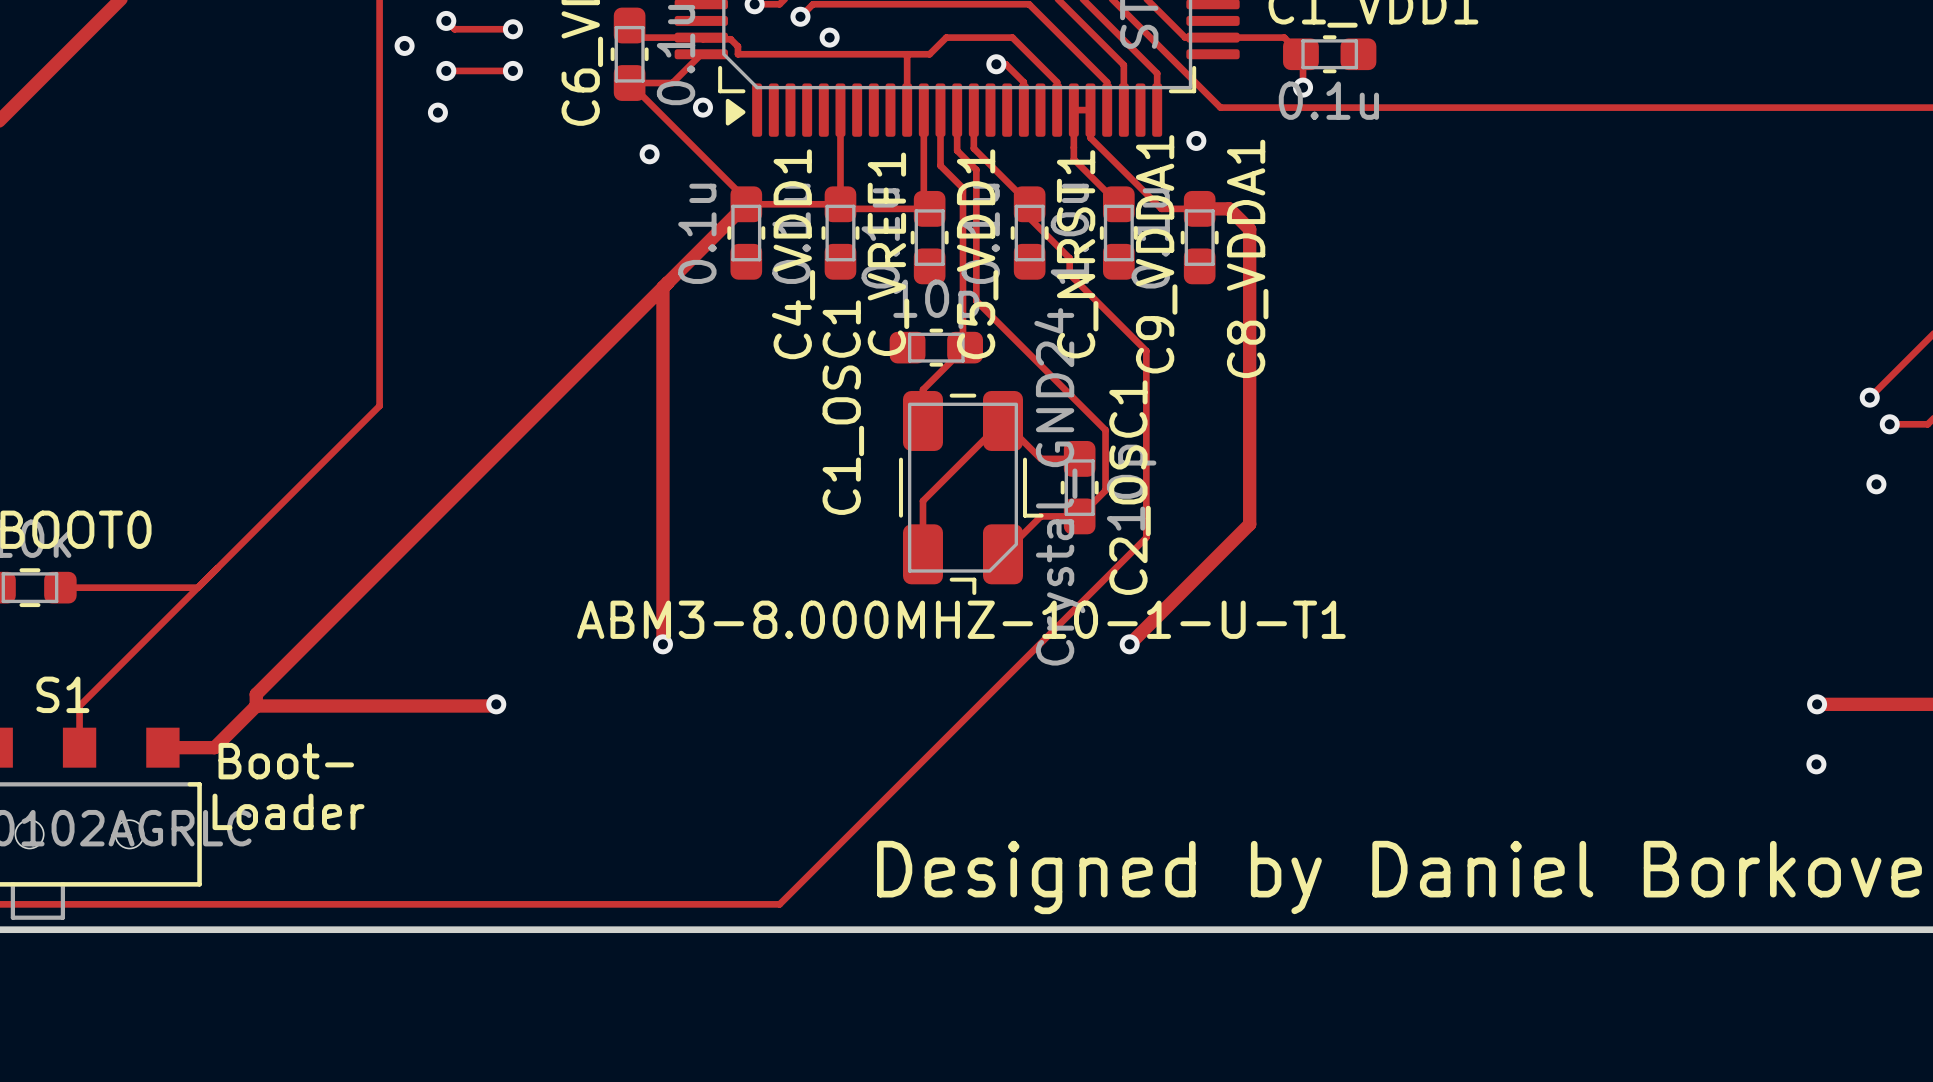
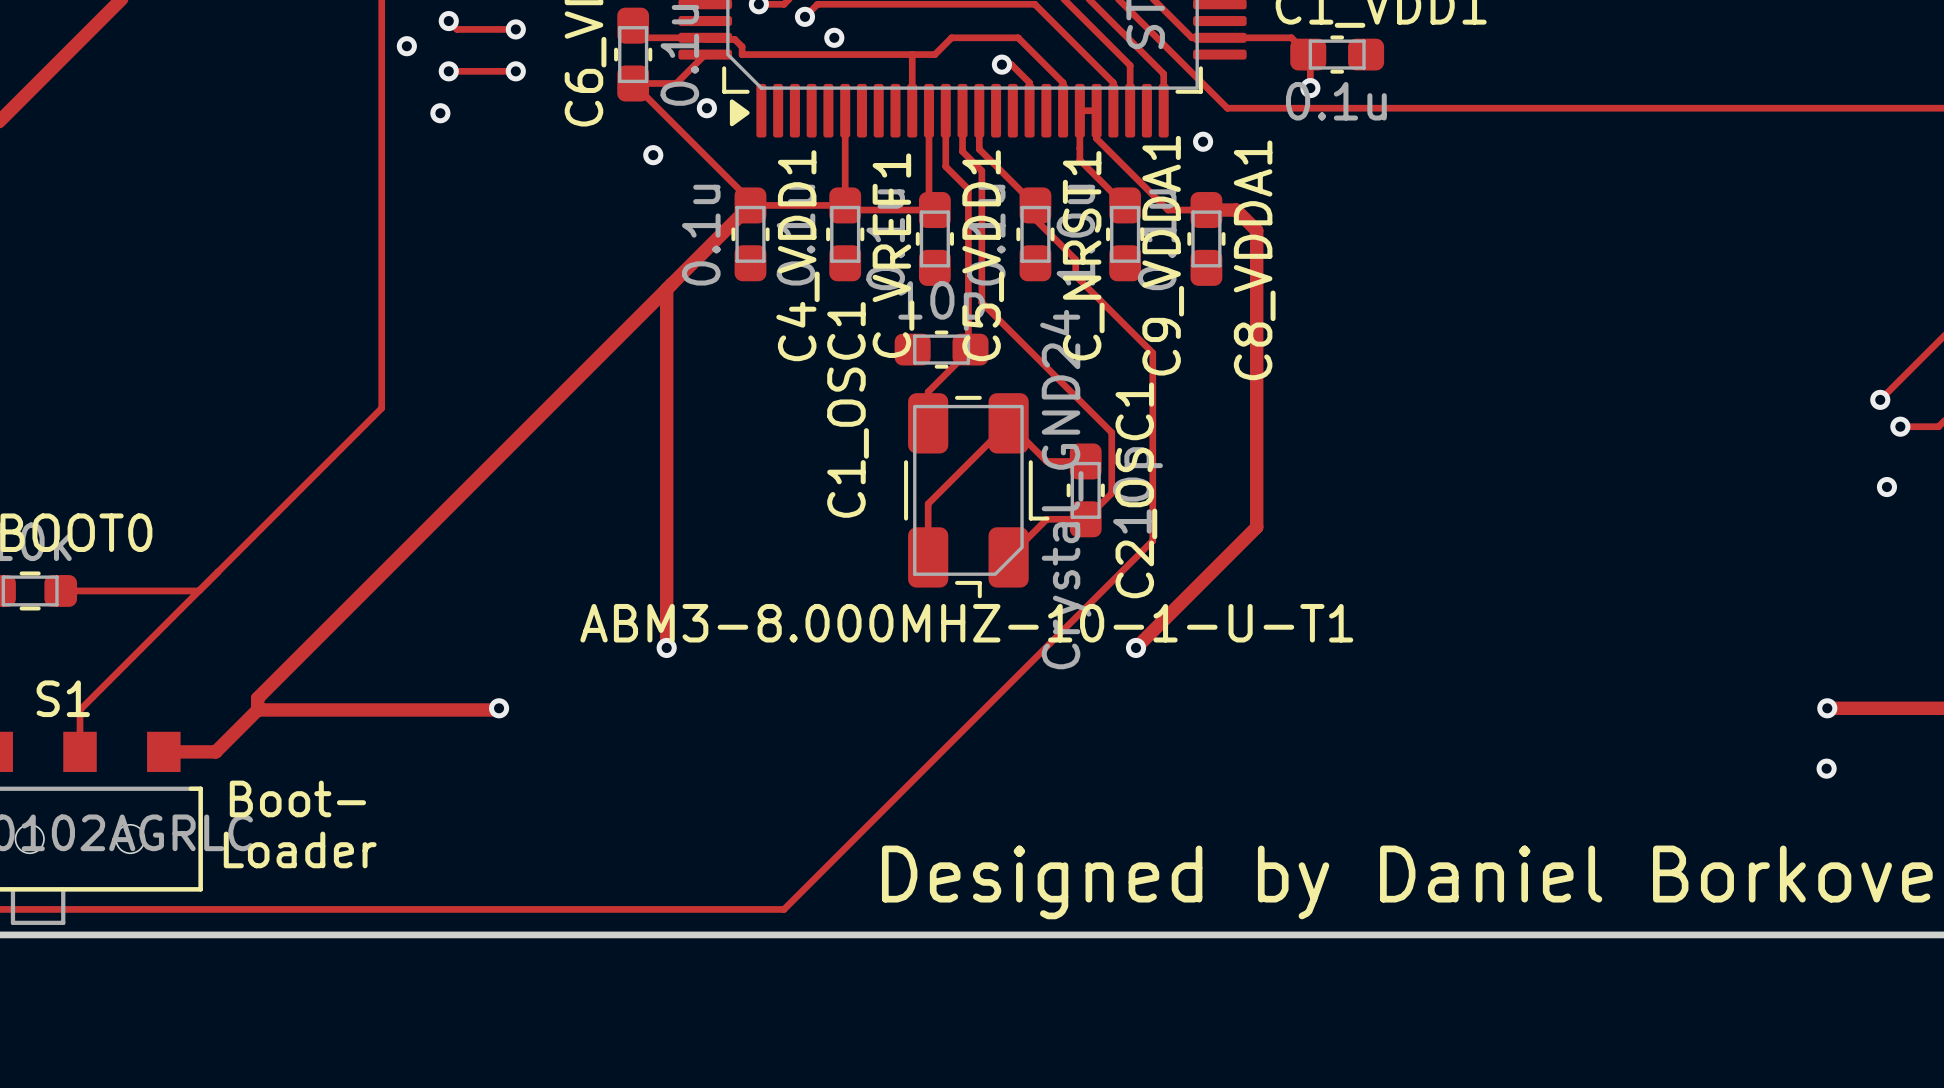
text position: Boot- (286, 761) -> Boot- (297, 798)
text position: Loader (288, 811) -> Loader (300, 849)

